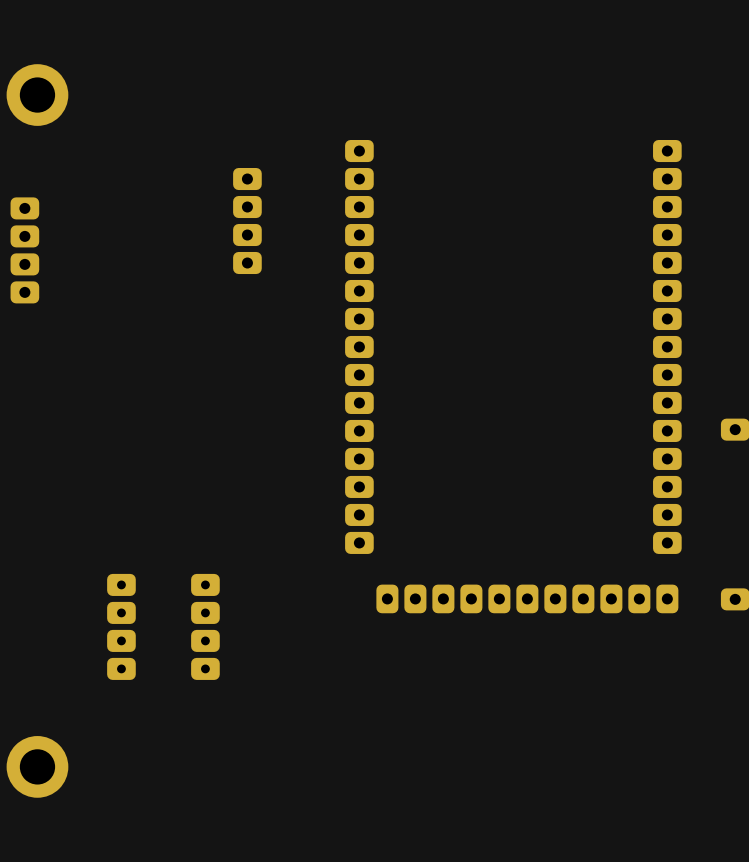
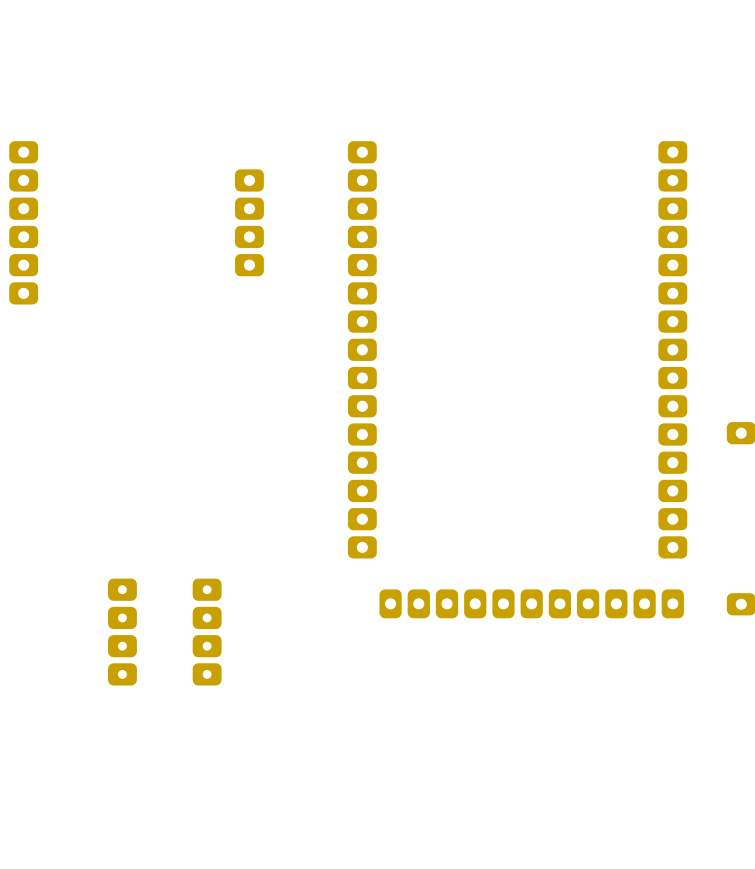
part: (37, 95) -> none
part: none -> (23, 222)
part: (24, 250) -> none
part: (37, 766) -> none

